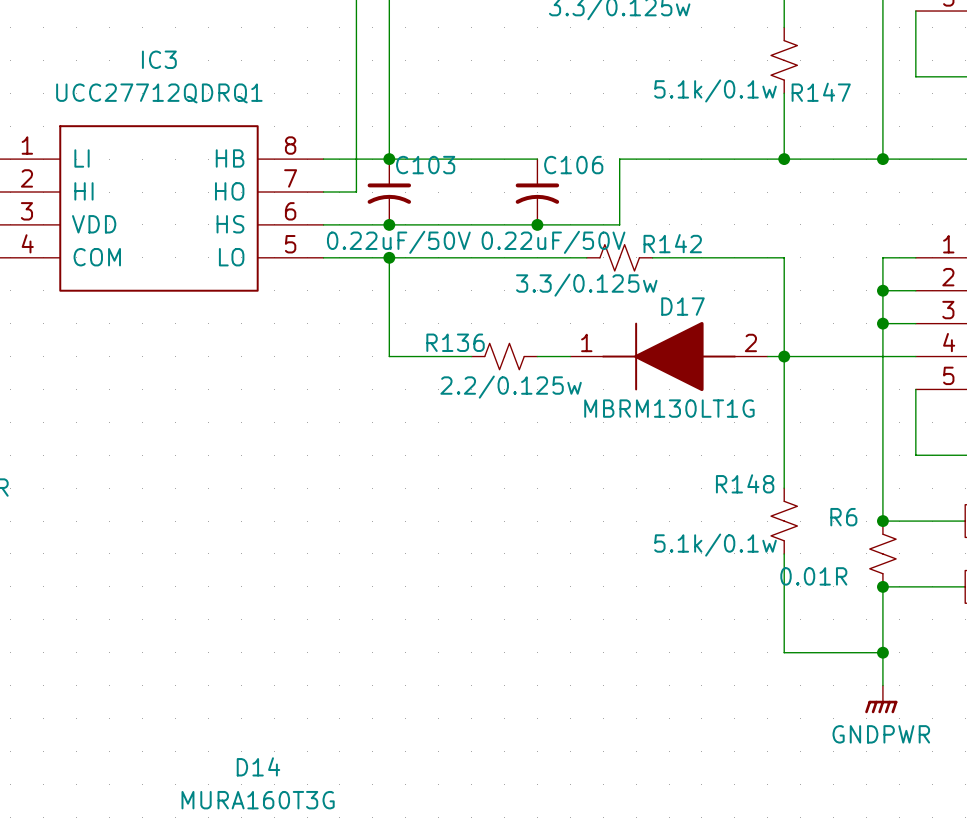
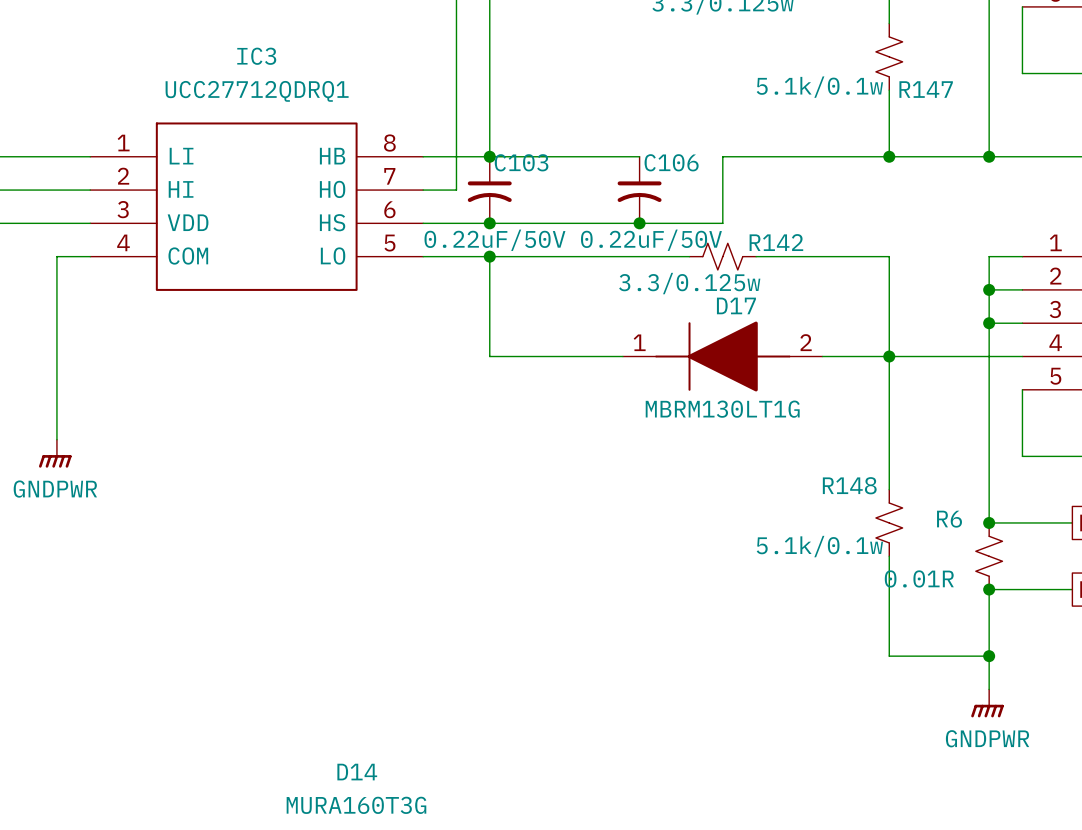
wire: none -> (572, 356) (622, 356)
R136: 2.2/0.125w (504, 356) -> none
D17 position: (669, 356) -> (722, 356)

